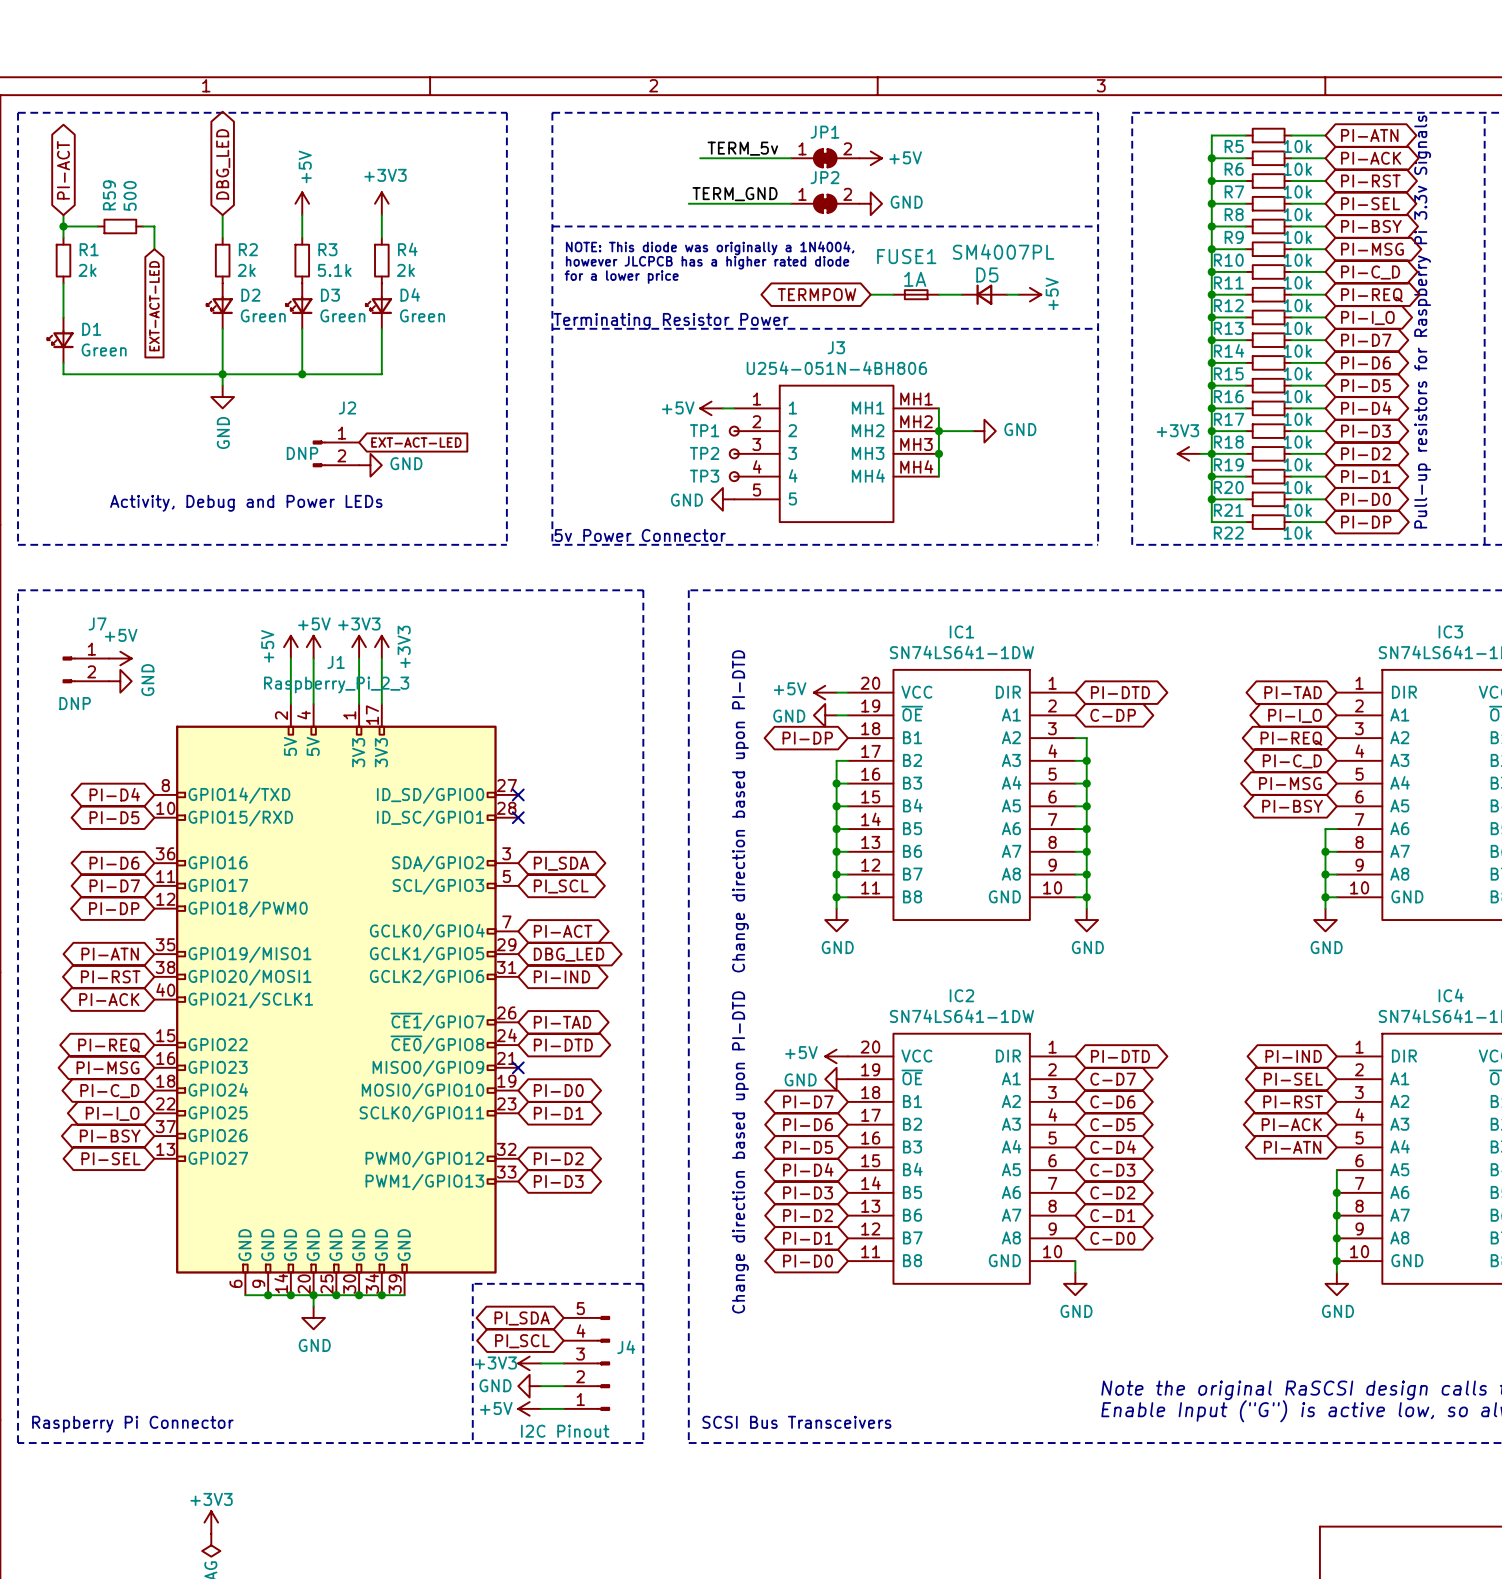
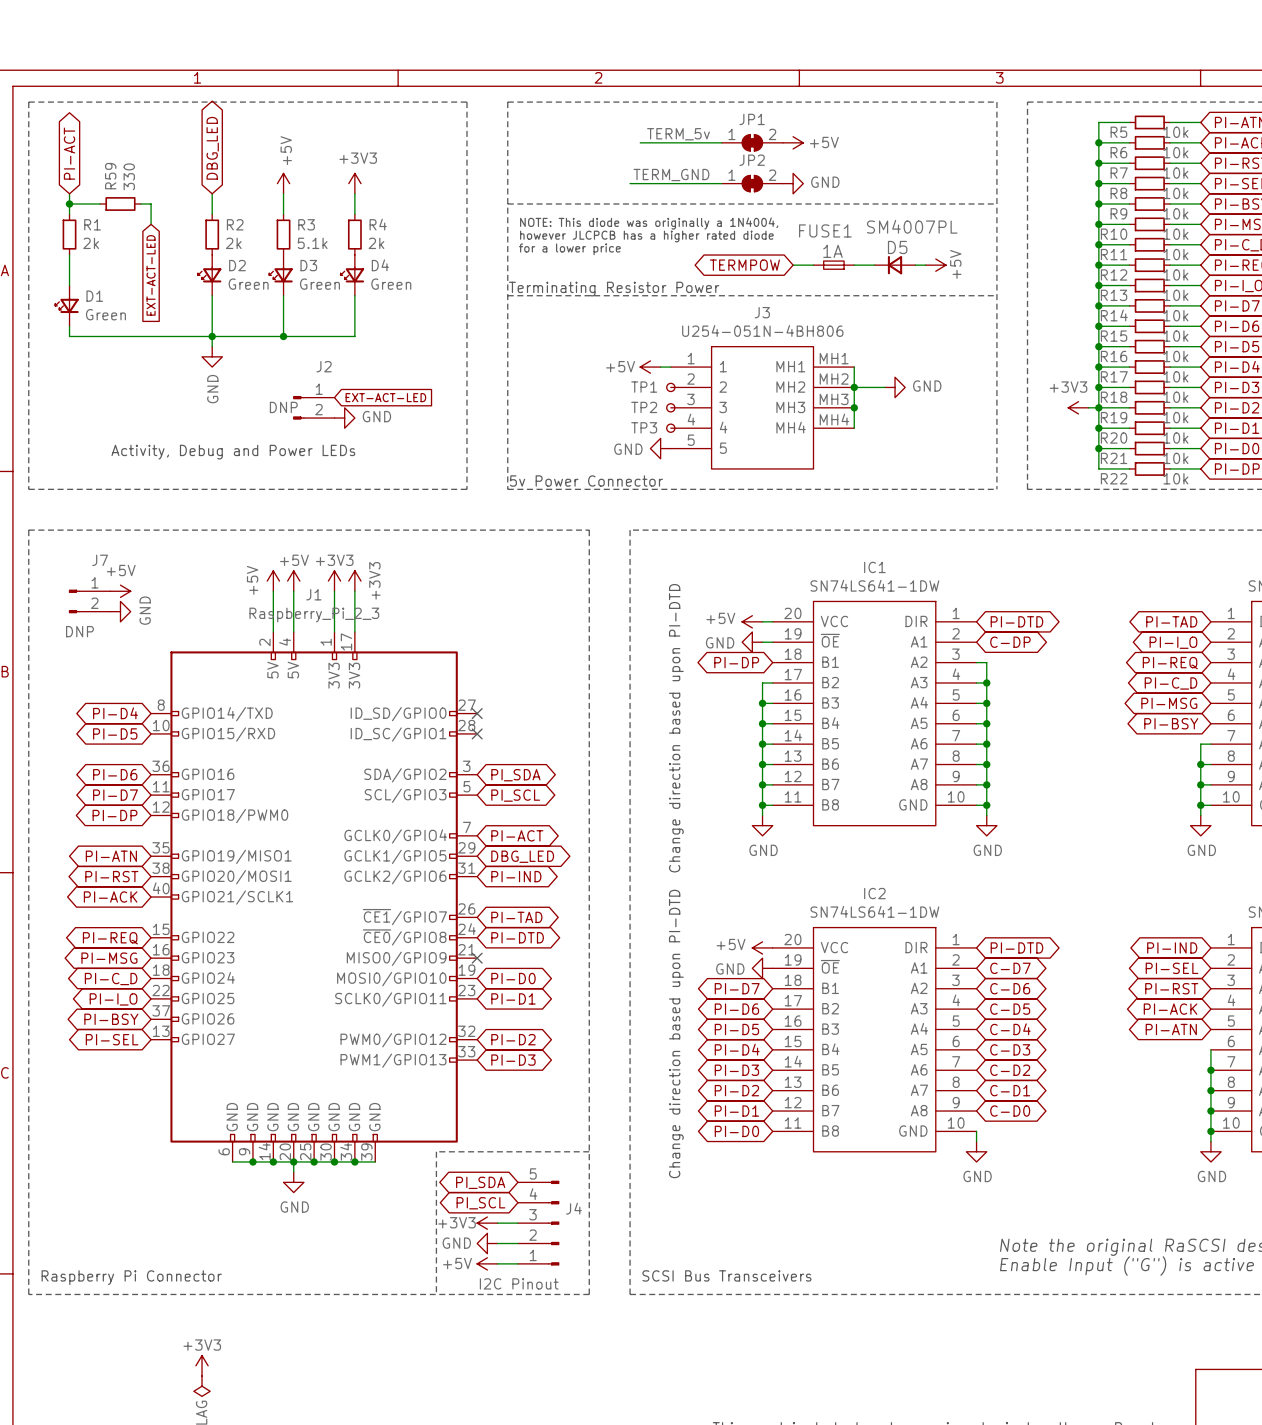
R59 value: 500 (130, 195) -> 330 (129, 176)

